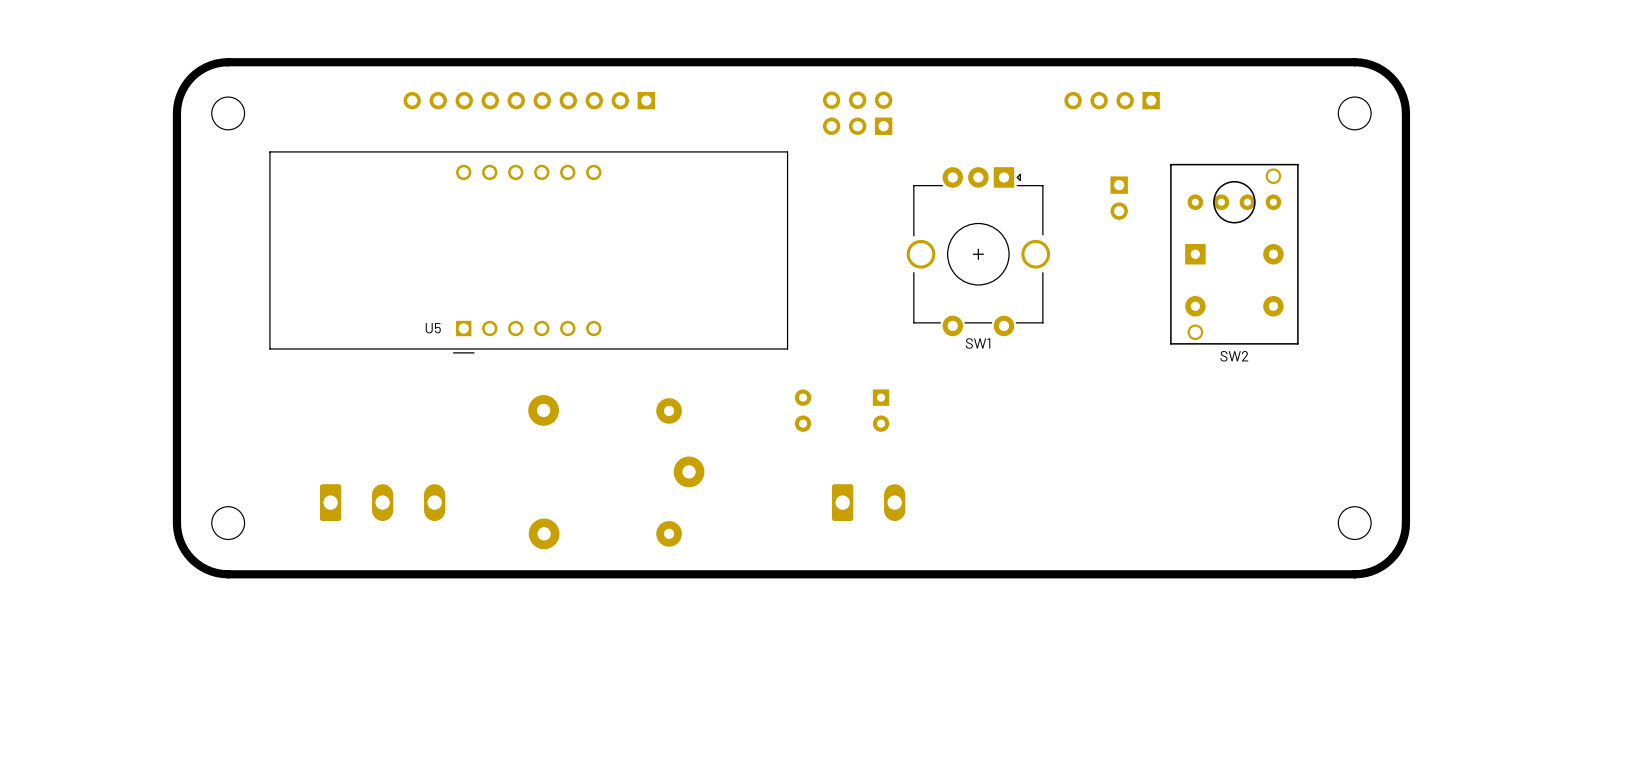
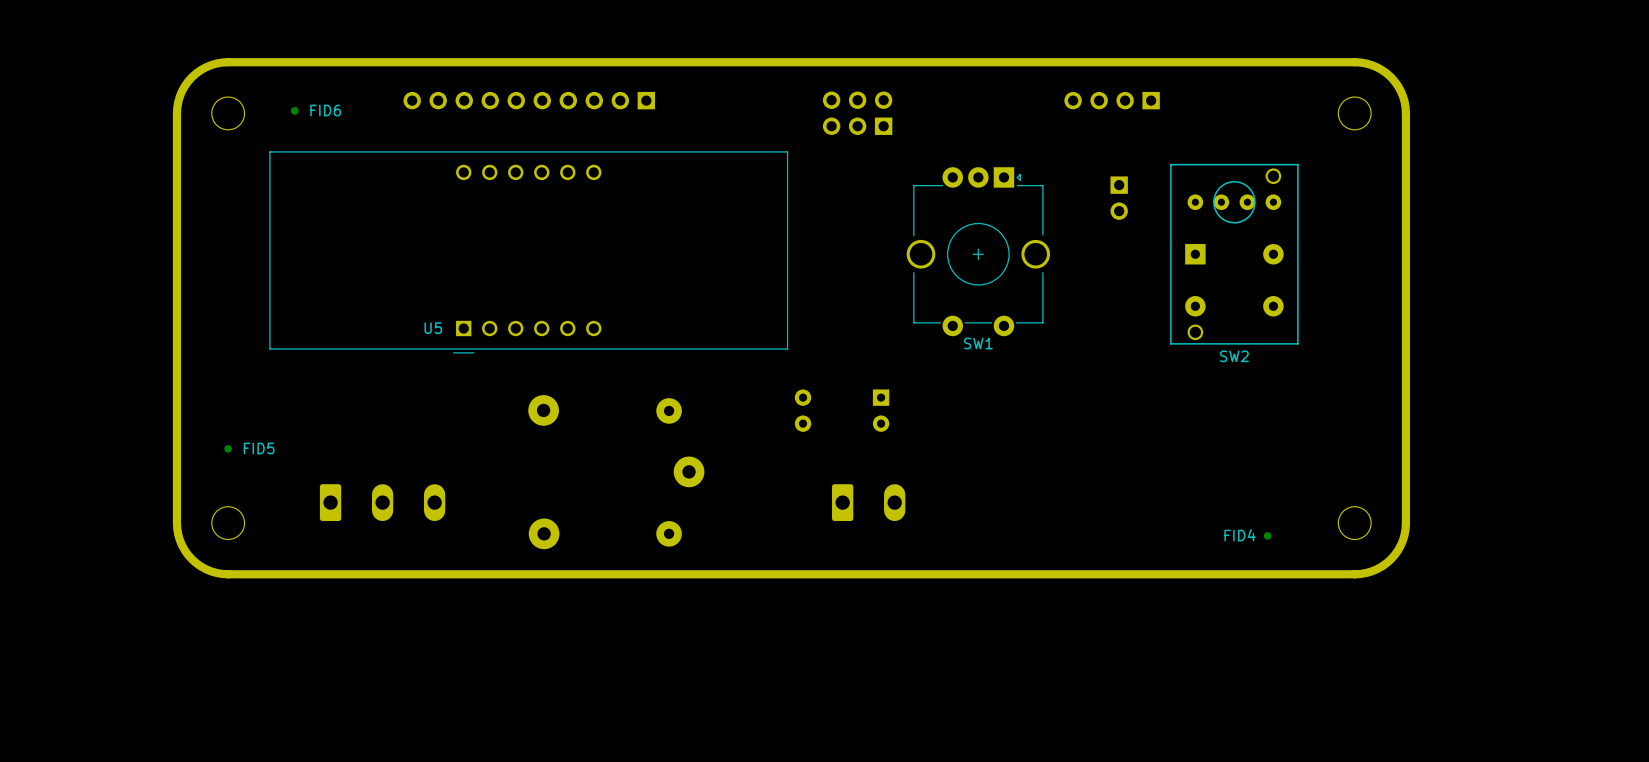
FID6: none -> (294, 110)
FID5: none -> (228, 448)
FID4: none -> (1267, 535)

